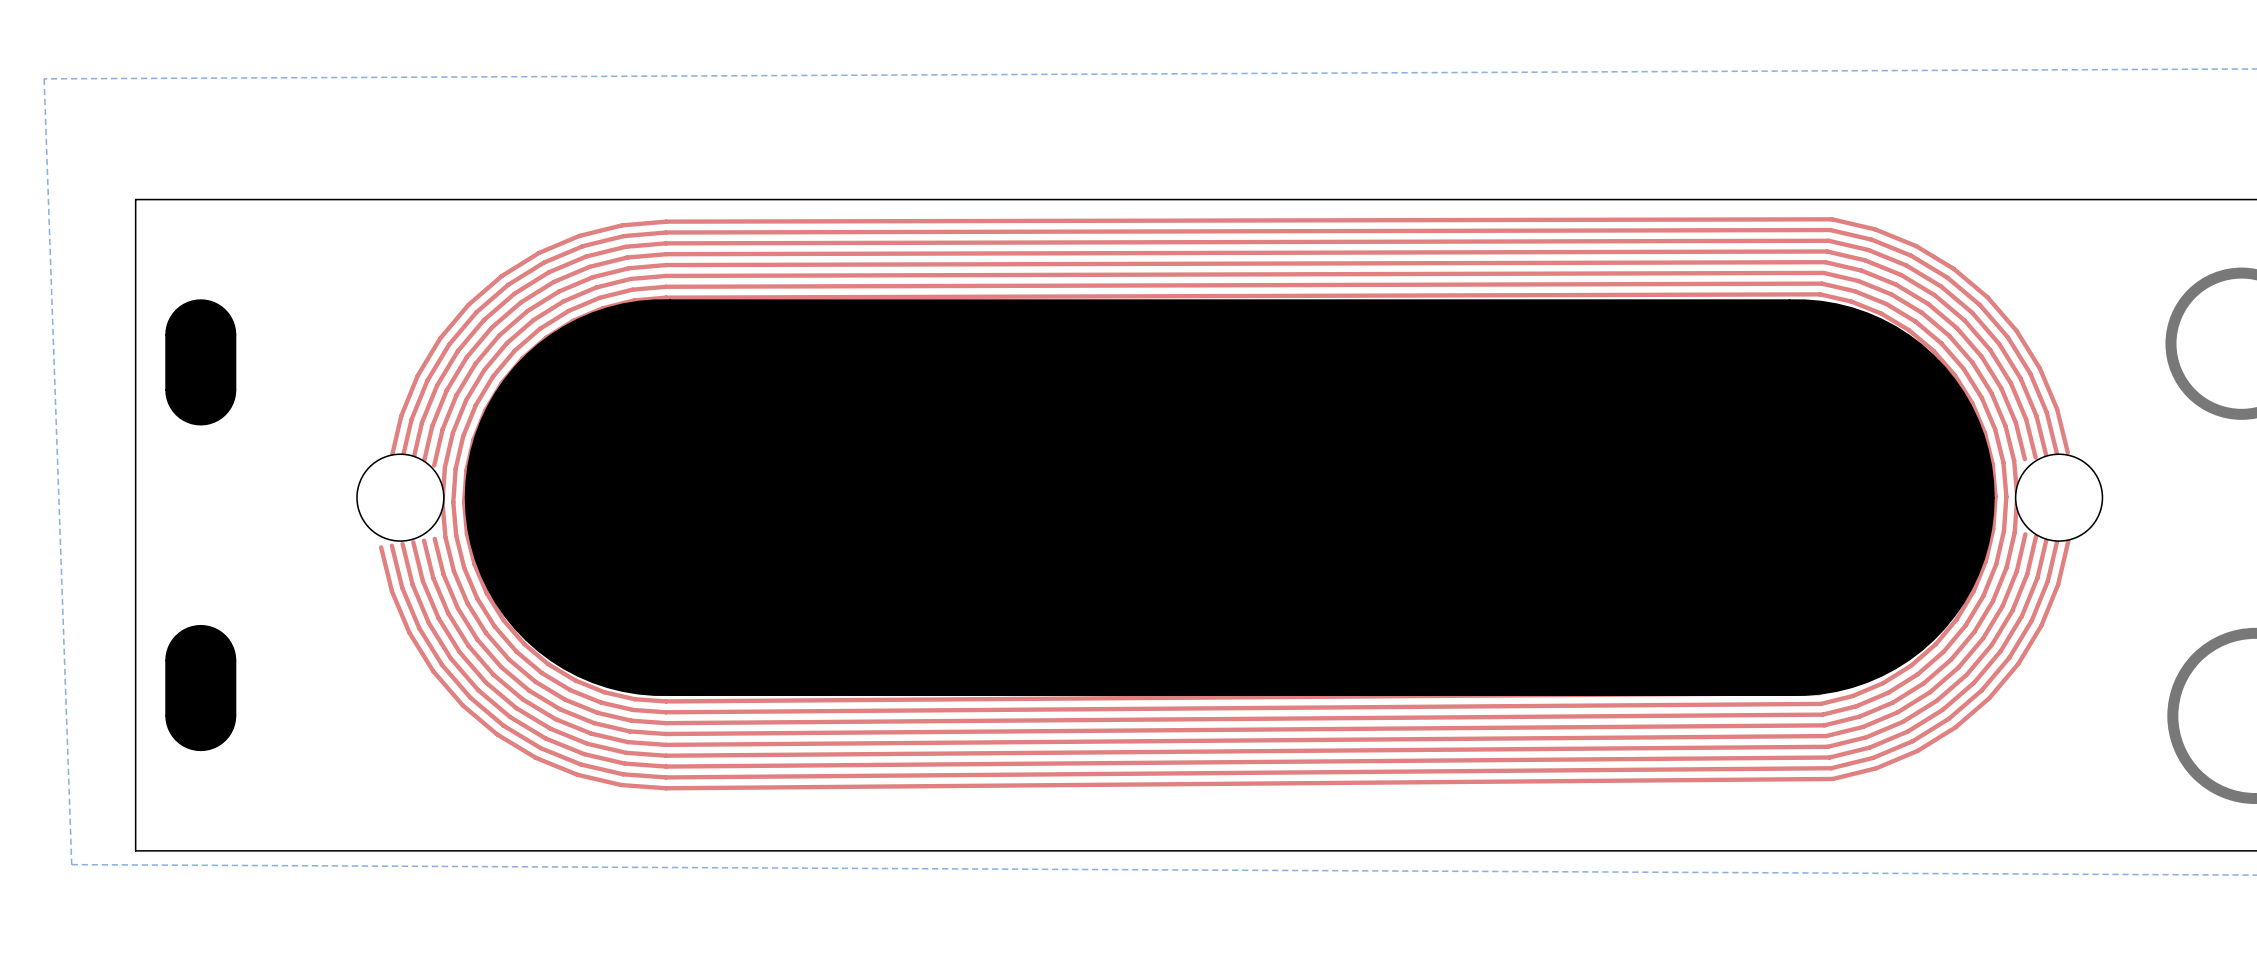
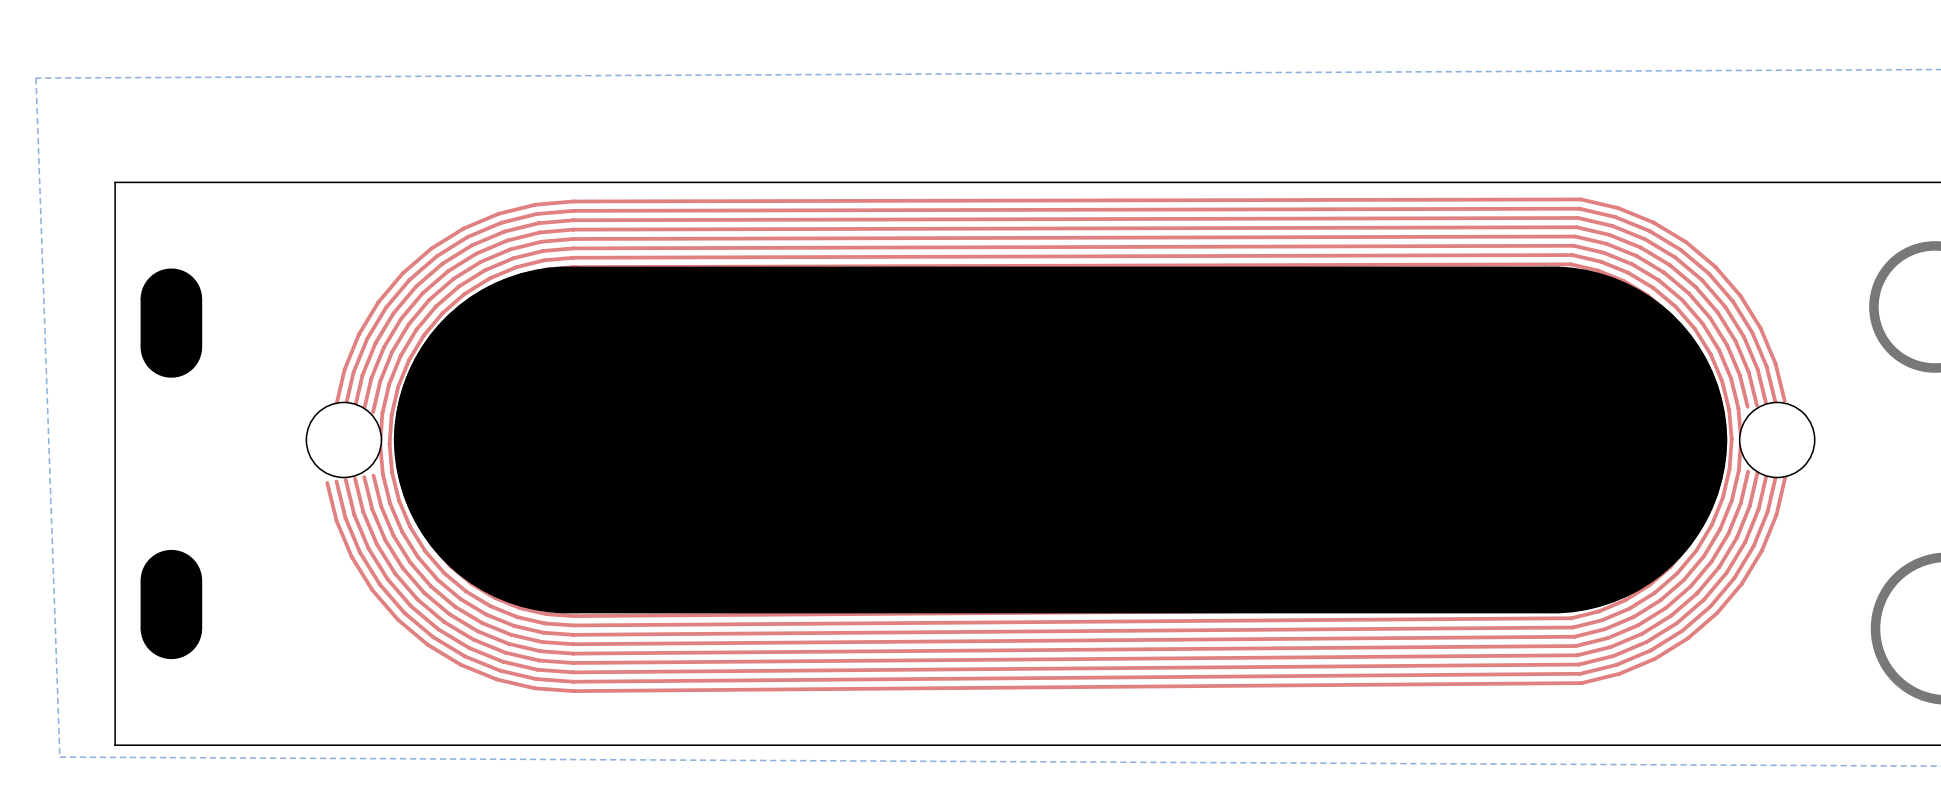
part footprint: [356, 299, 2103, 696] -> [306, 267, 1815, 613]

